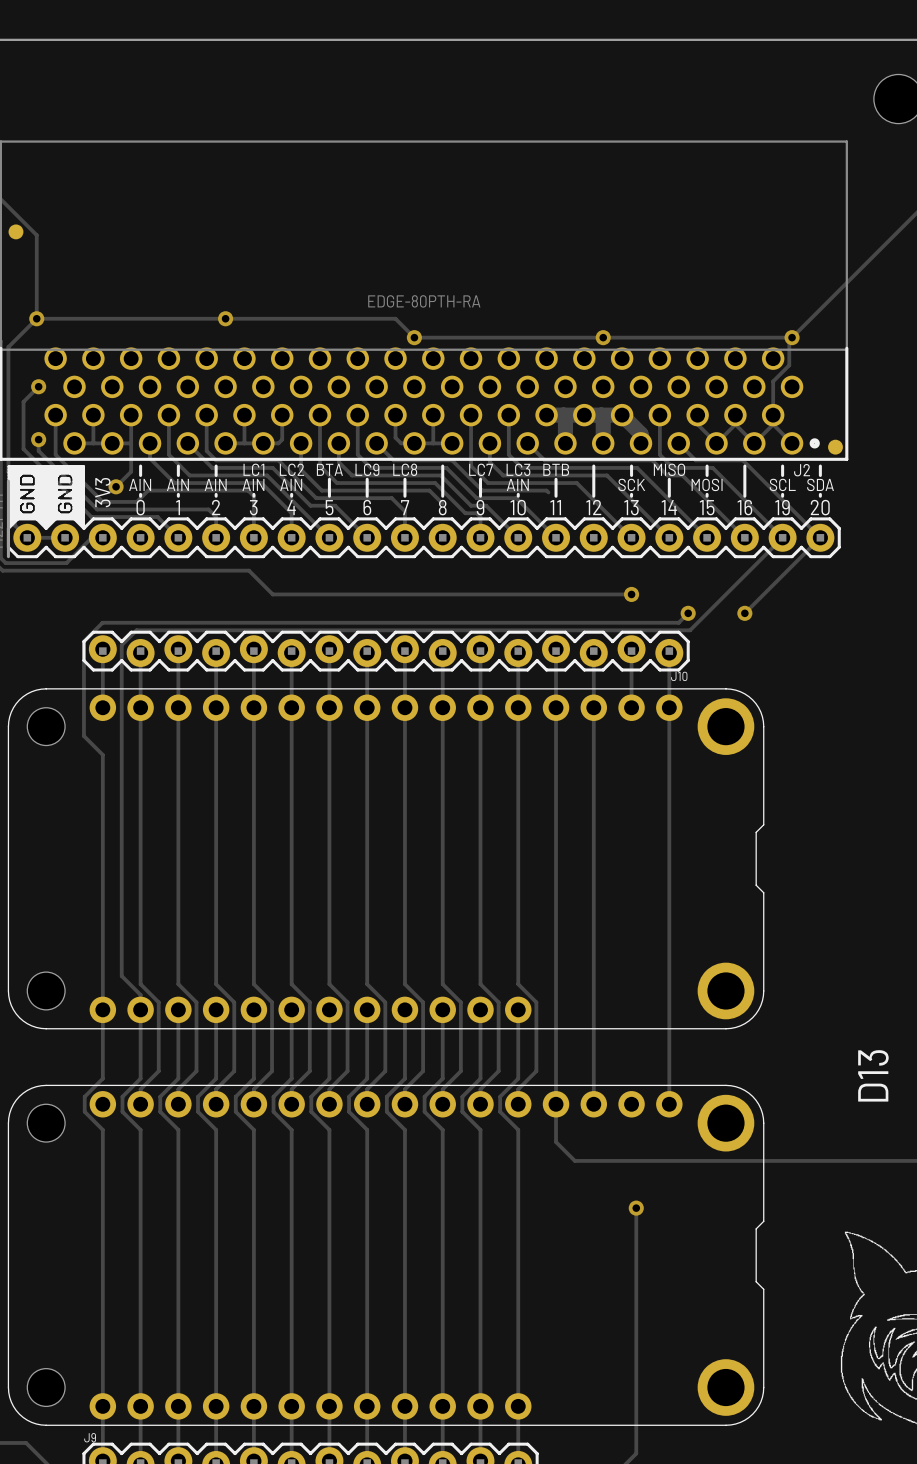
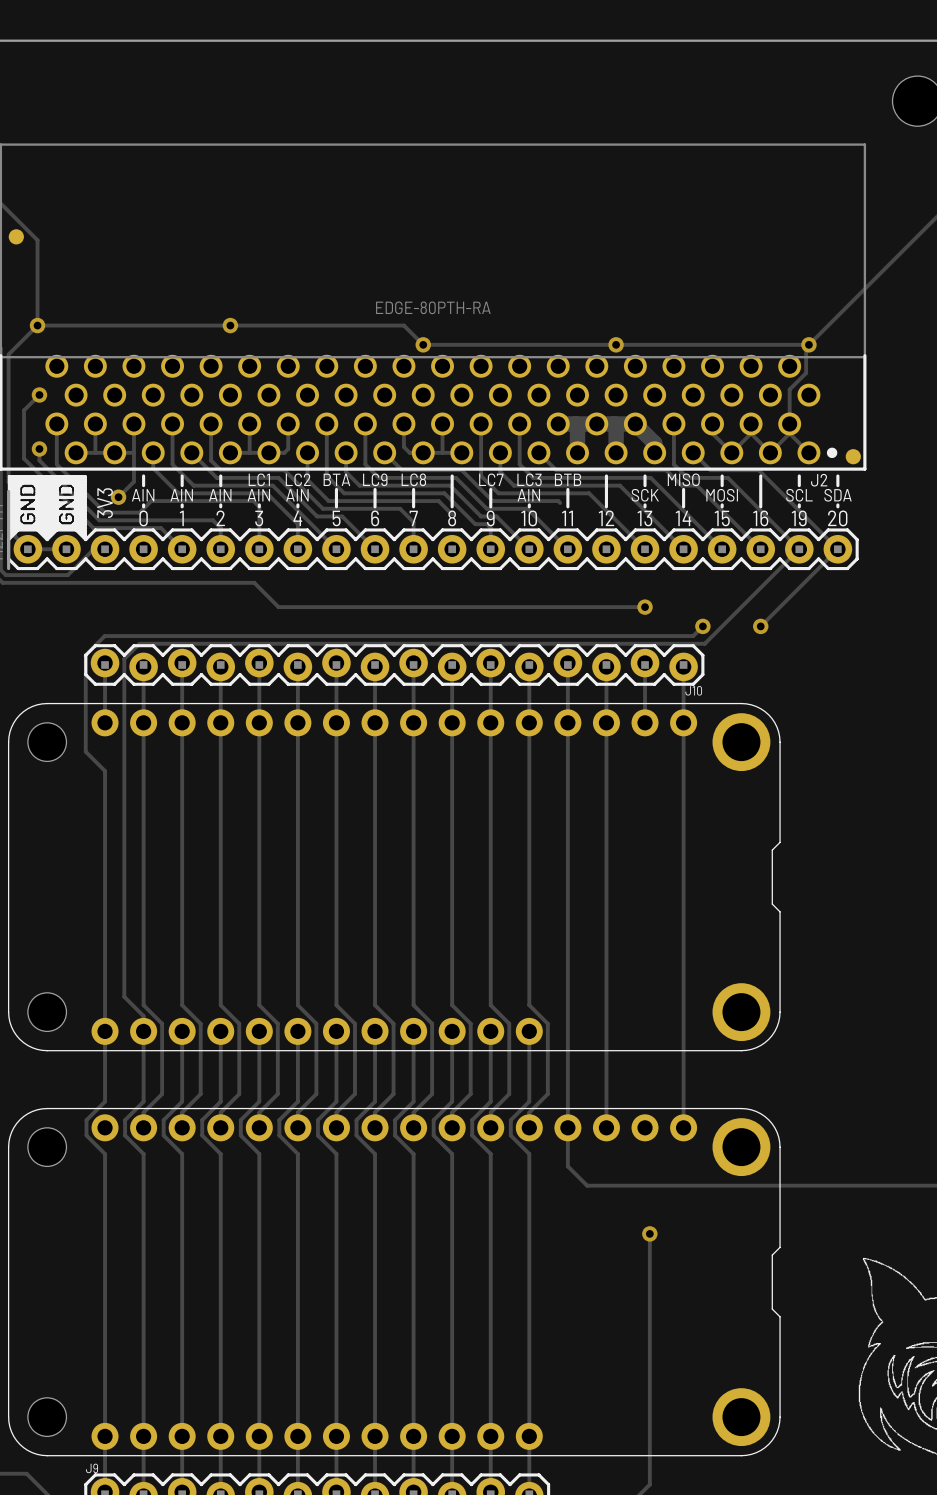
text: D13 (873, 1075) -> none

